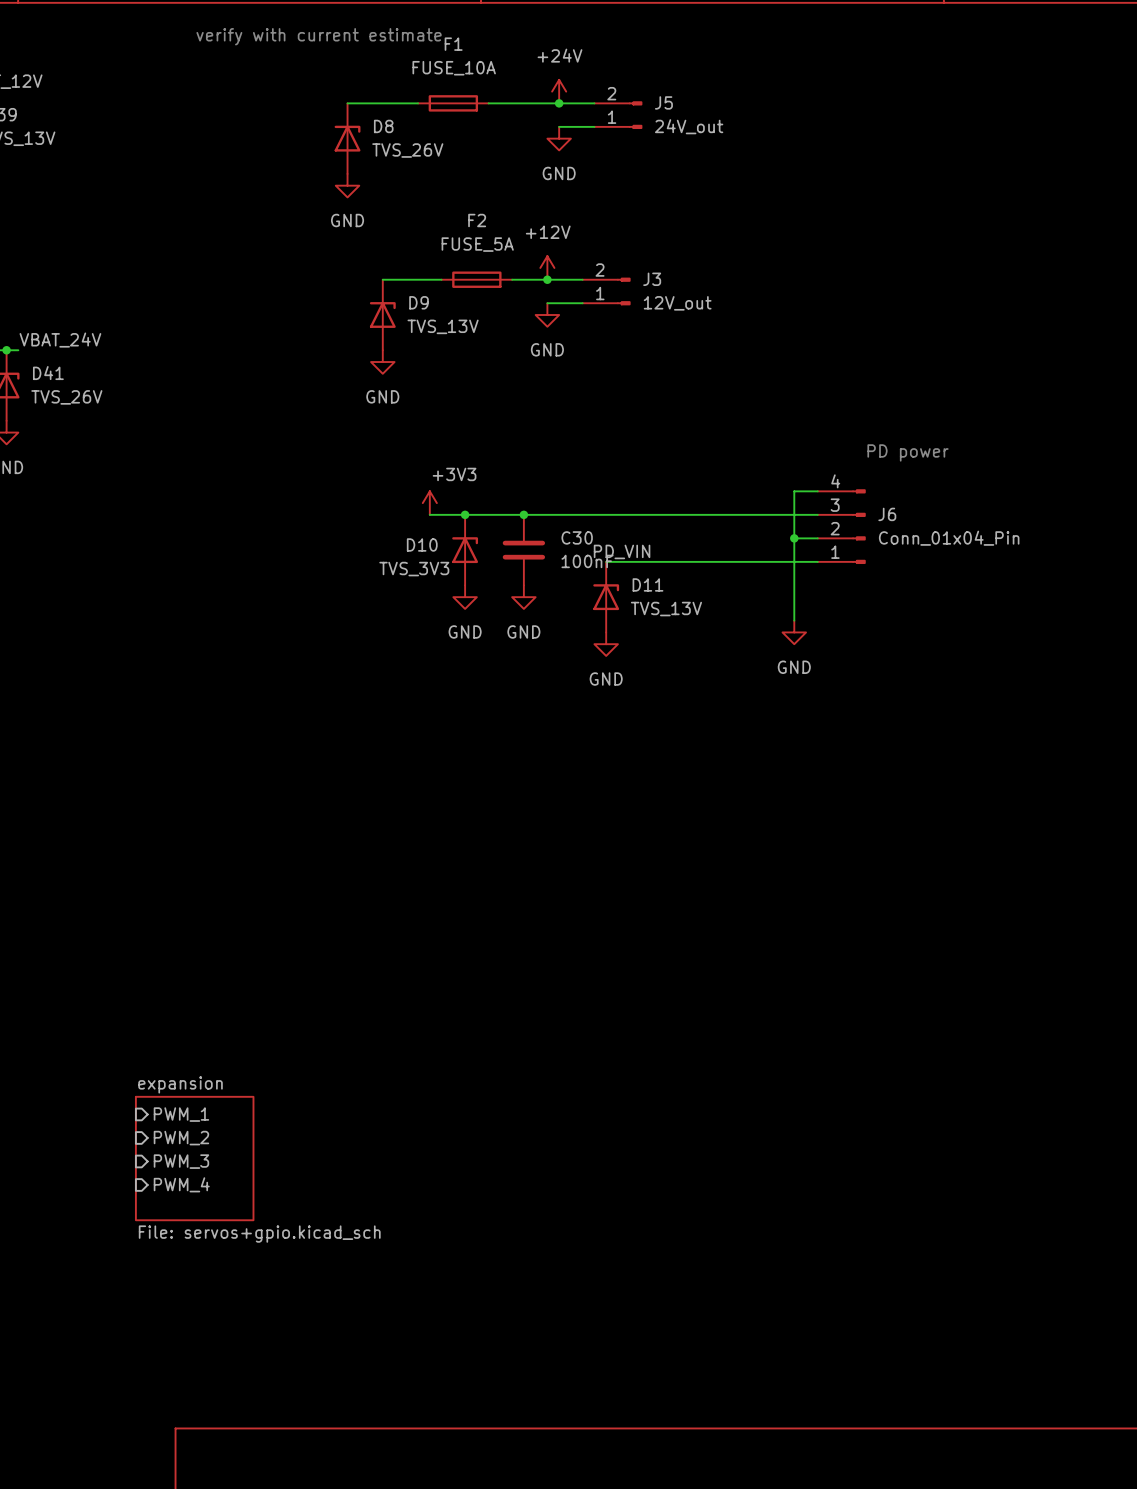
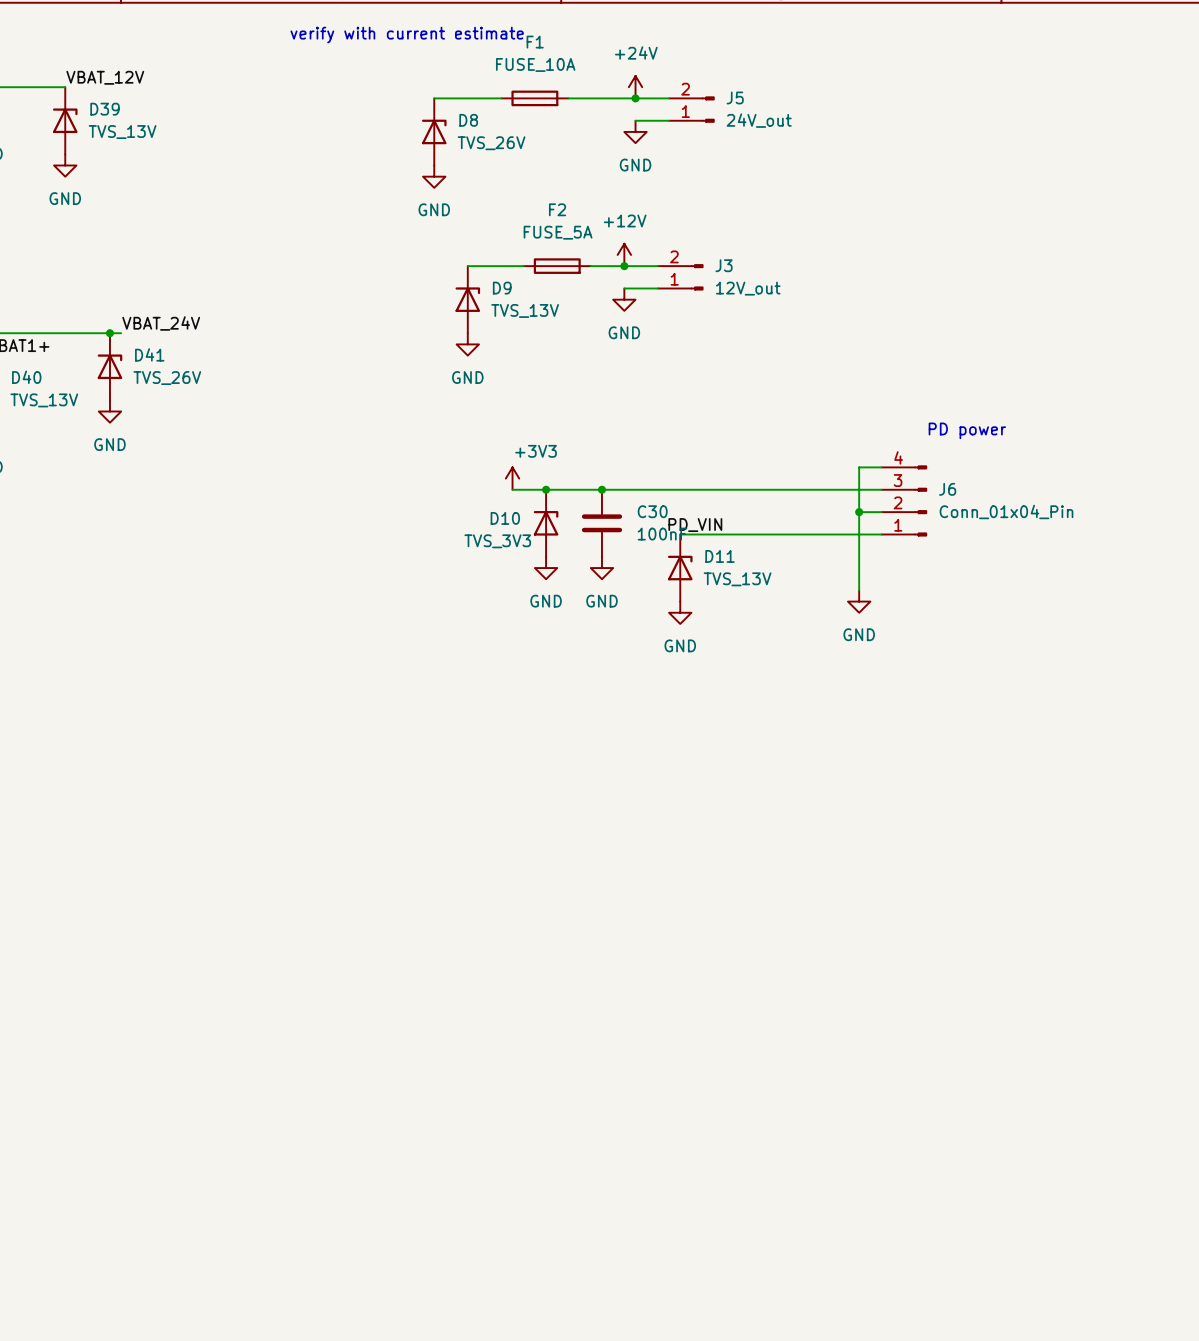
sheet pin: PWM_1 (181, 1114) -> none
sheet pin: PWM_2 (181, 1138) -> none
sheet expansion: File: servos+gpio.kicad_sch (194, 1158) -> none
sheet pin: PWM_3 (181, 1161) -> none
sheet pin: PWM_4 (181, 1184) -> none

